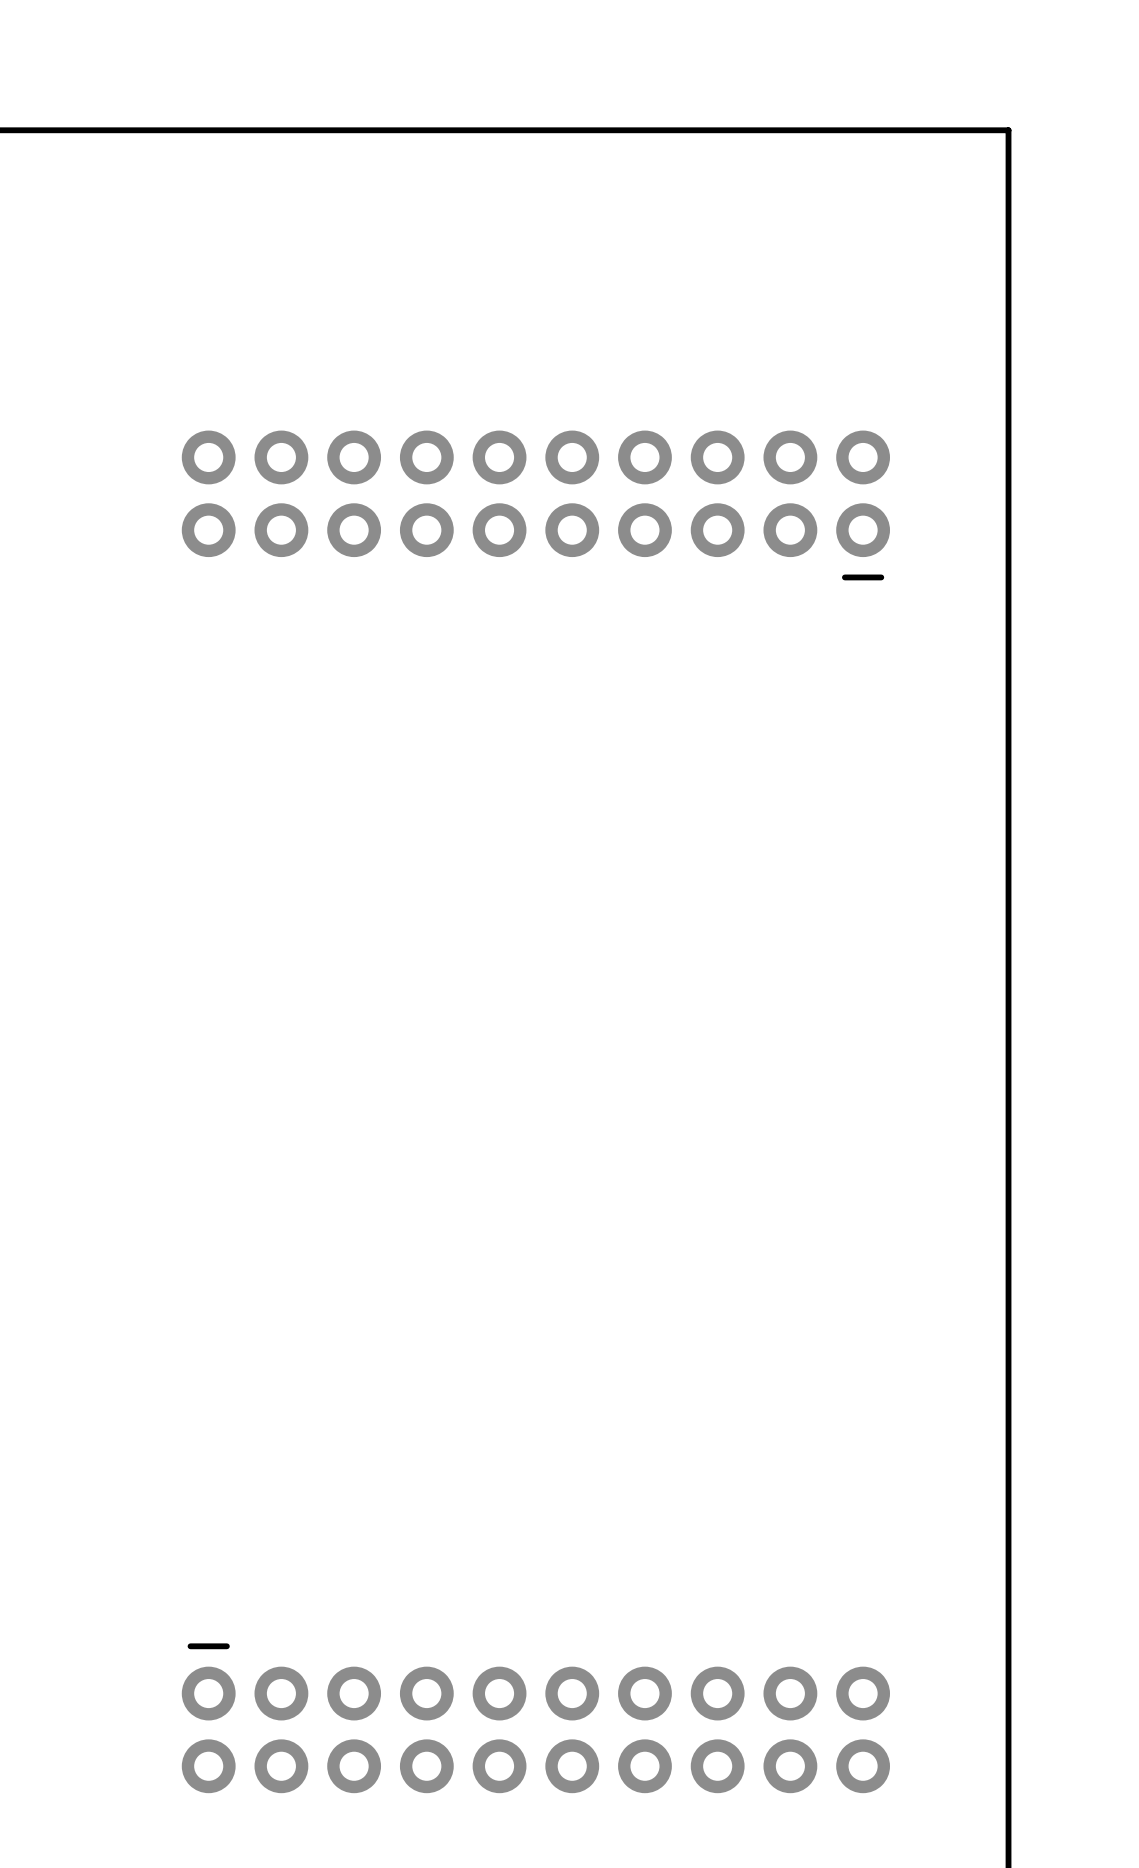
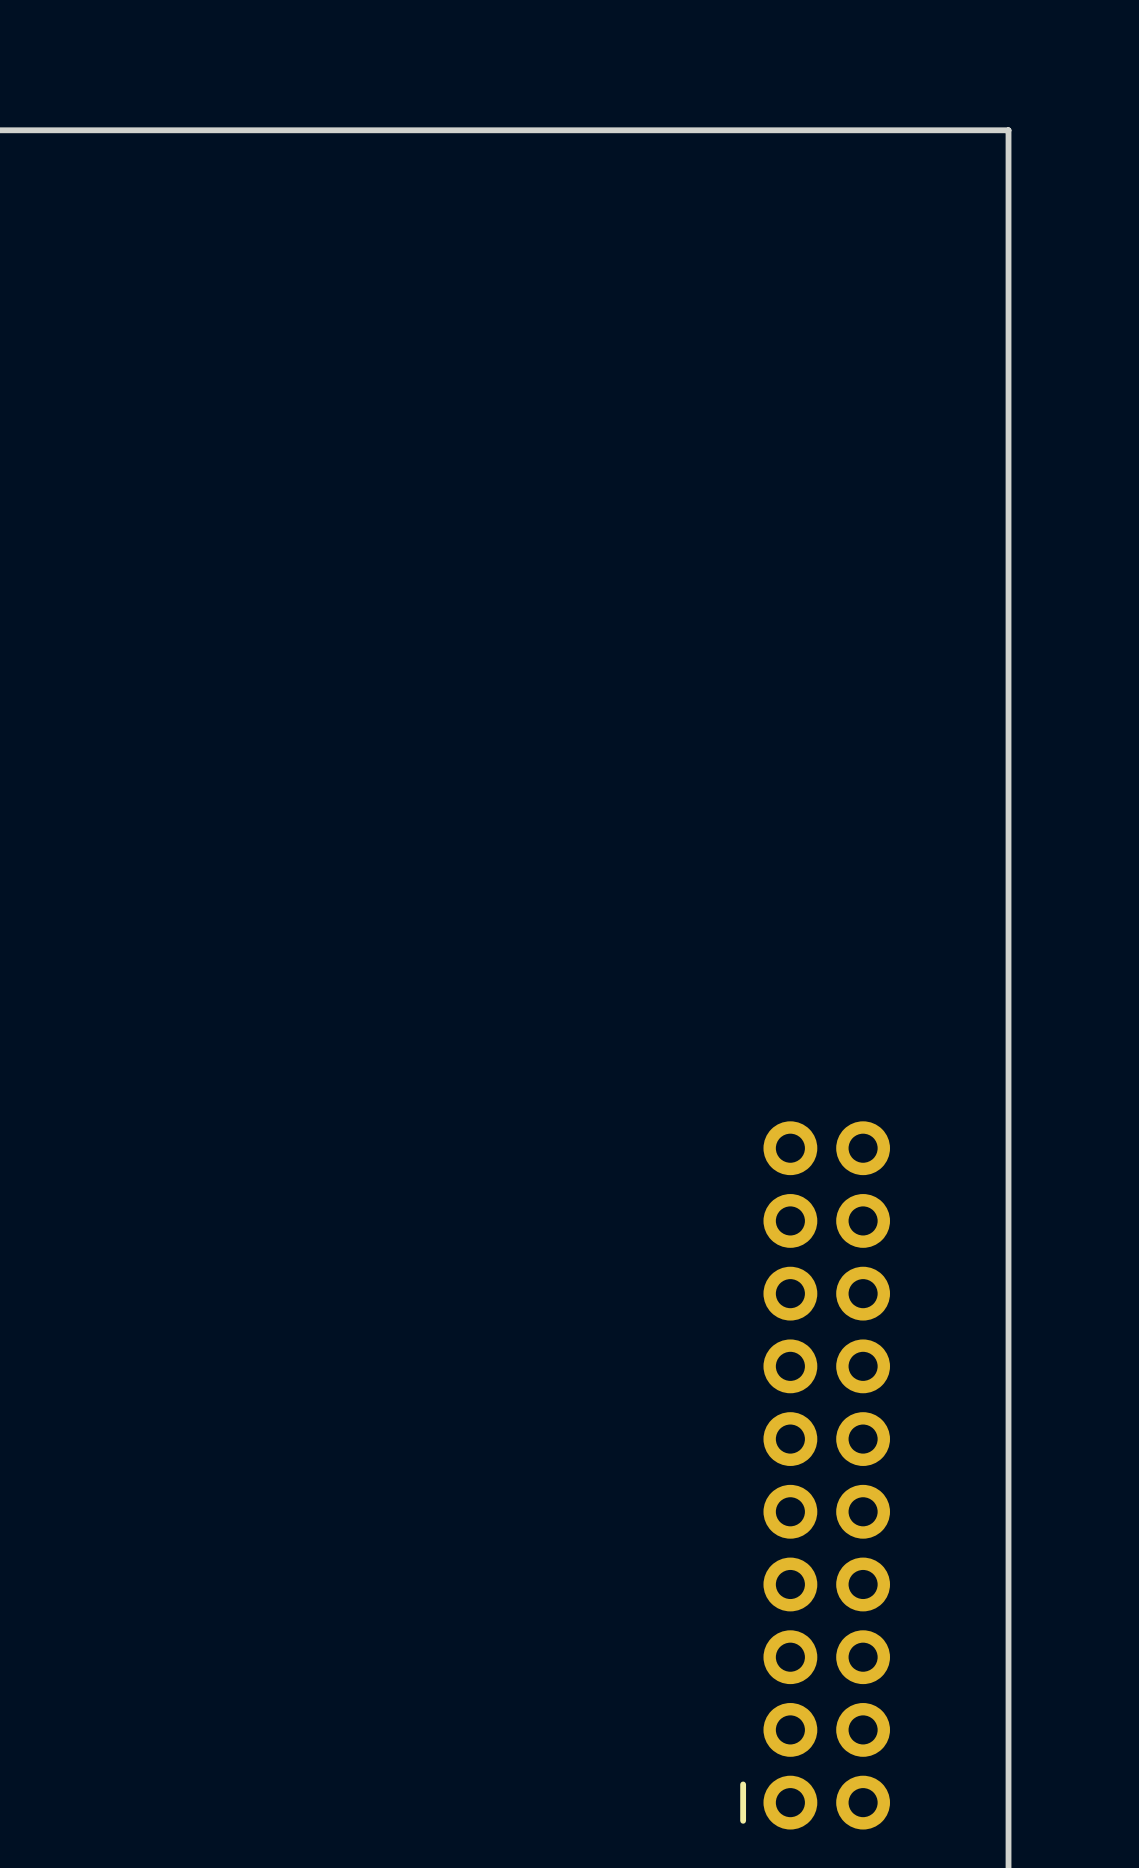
part: (535, 505) -> none
part rotation: 0° (535, 1718) -> 90° counterclockwise (815, 1475)

